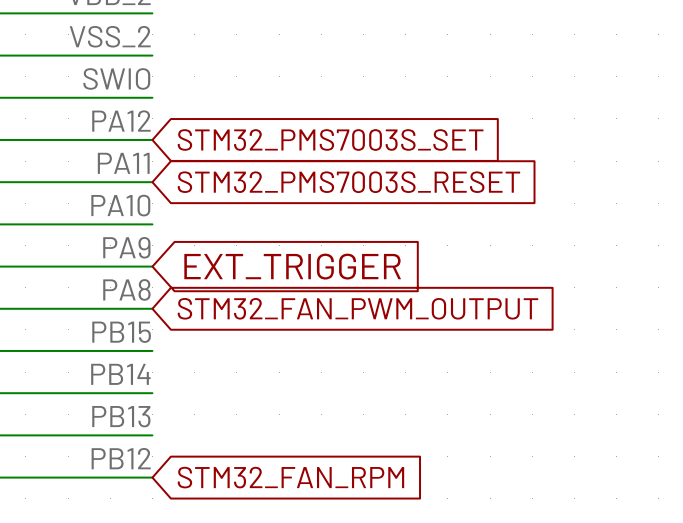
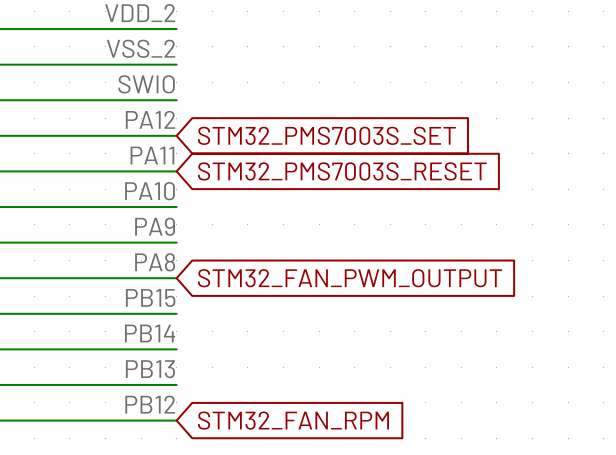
global label: EXT_TRIGGER (292, 266) -> none

